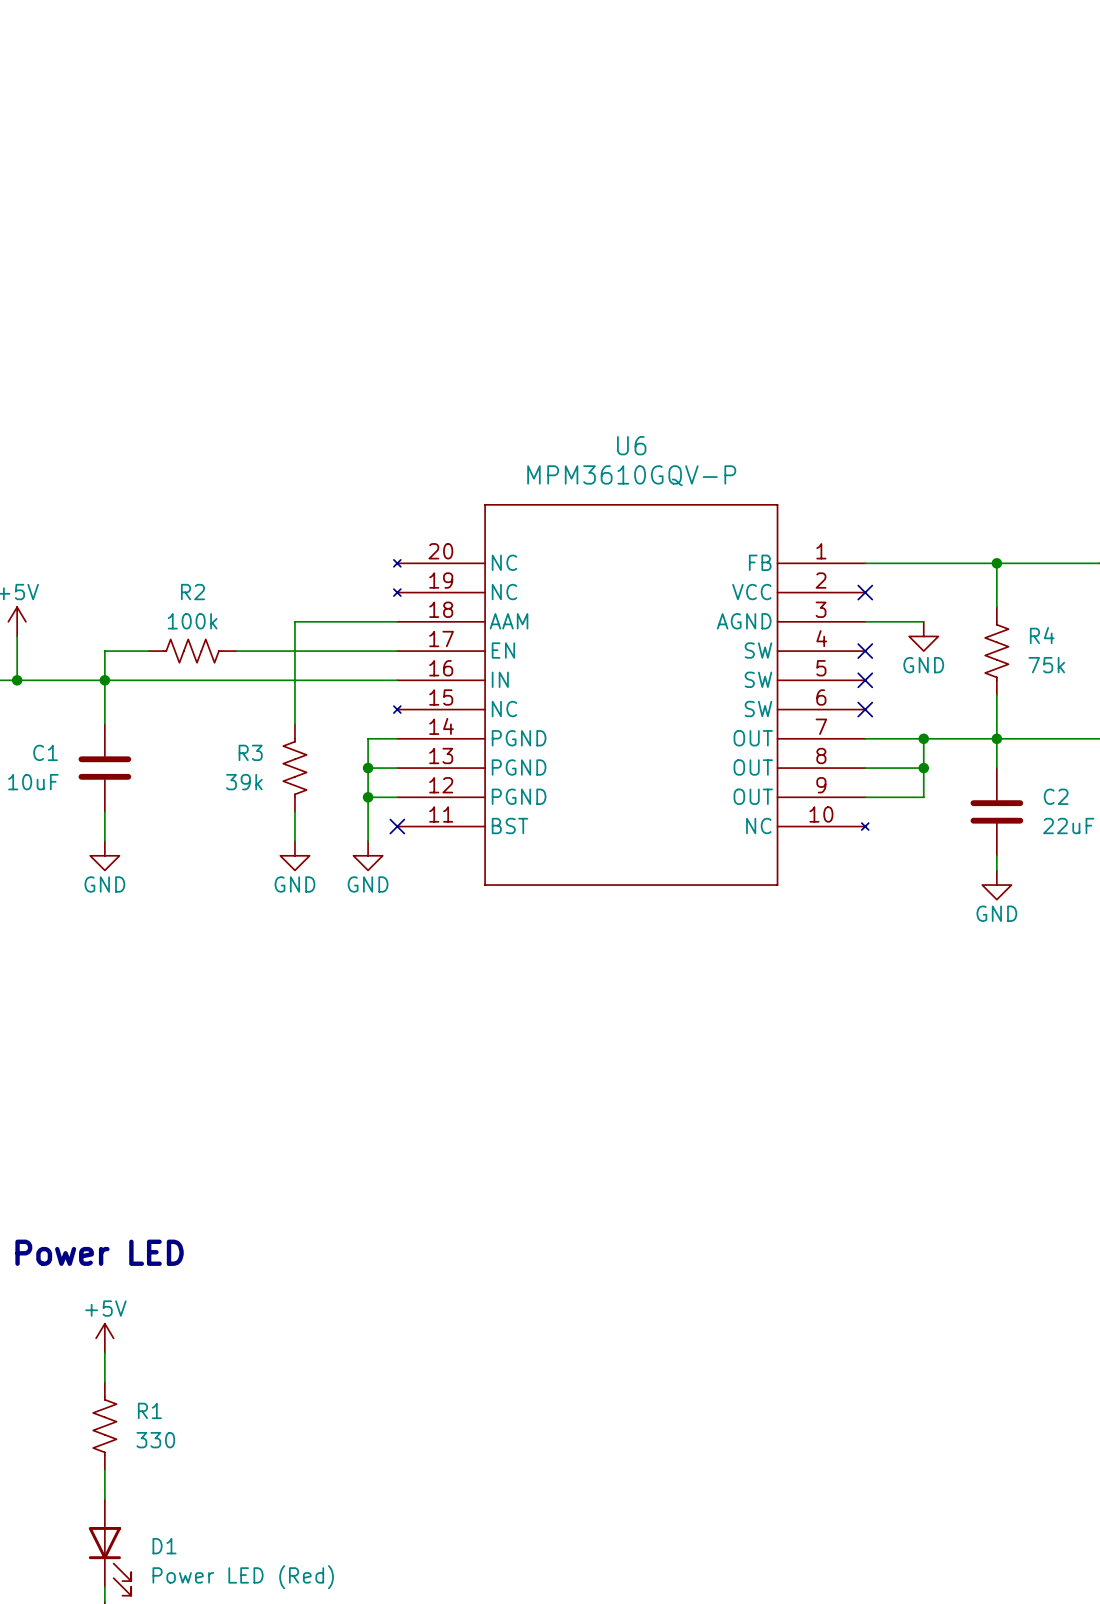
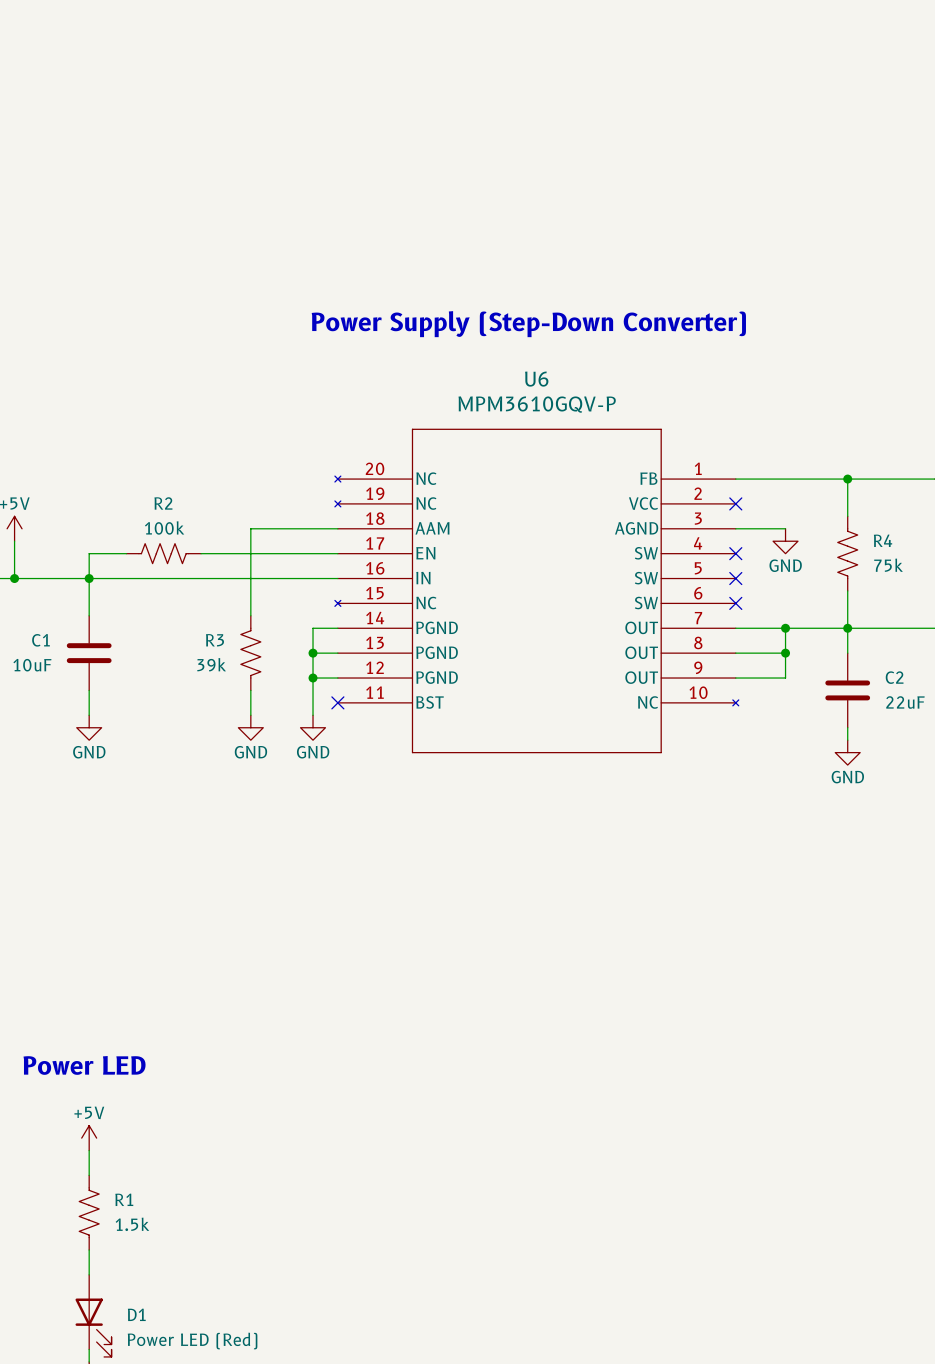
text: none -> Power Supply (Step-Down Converter) (528, 324)
R1 value: 330 (155, 1440) -> 1.5k (132, 1224)

